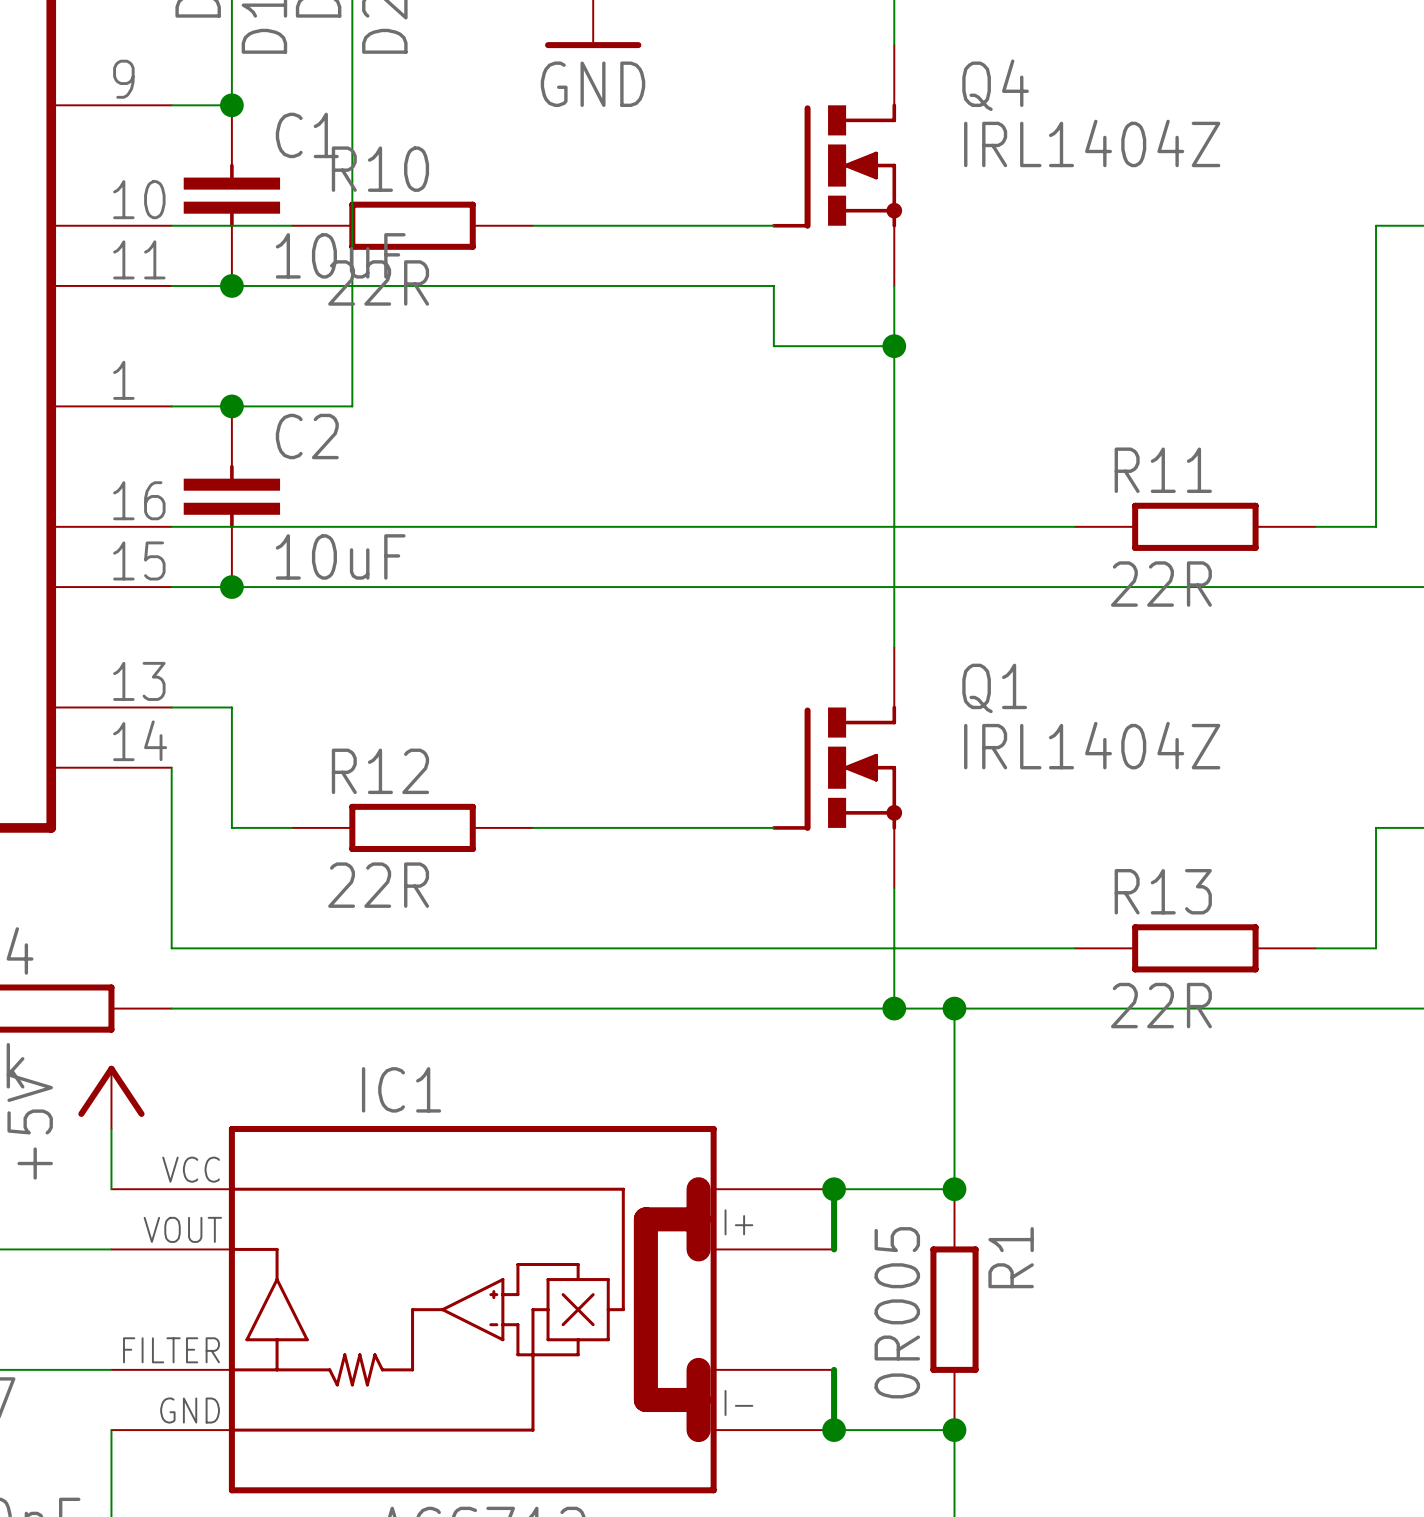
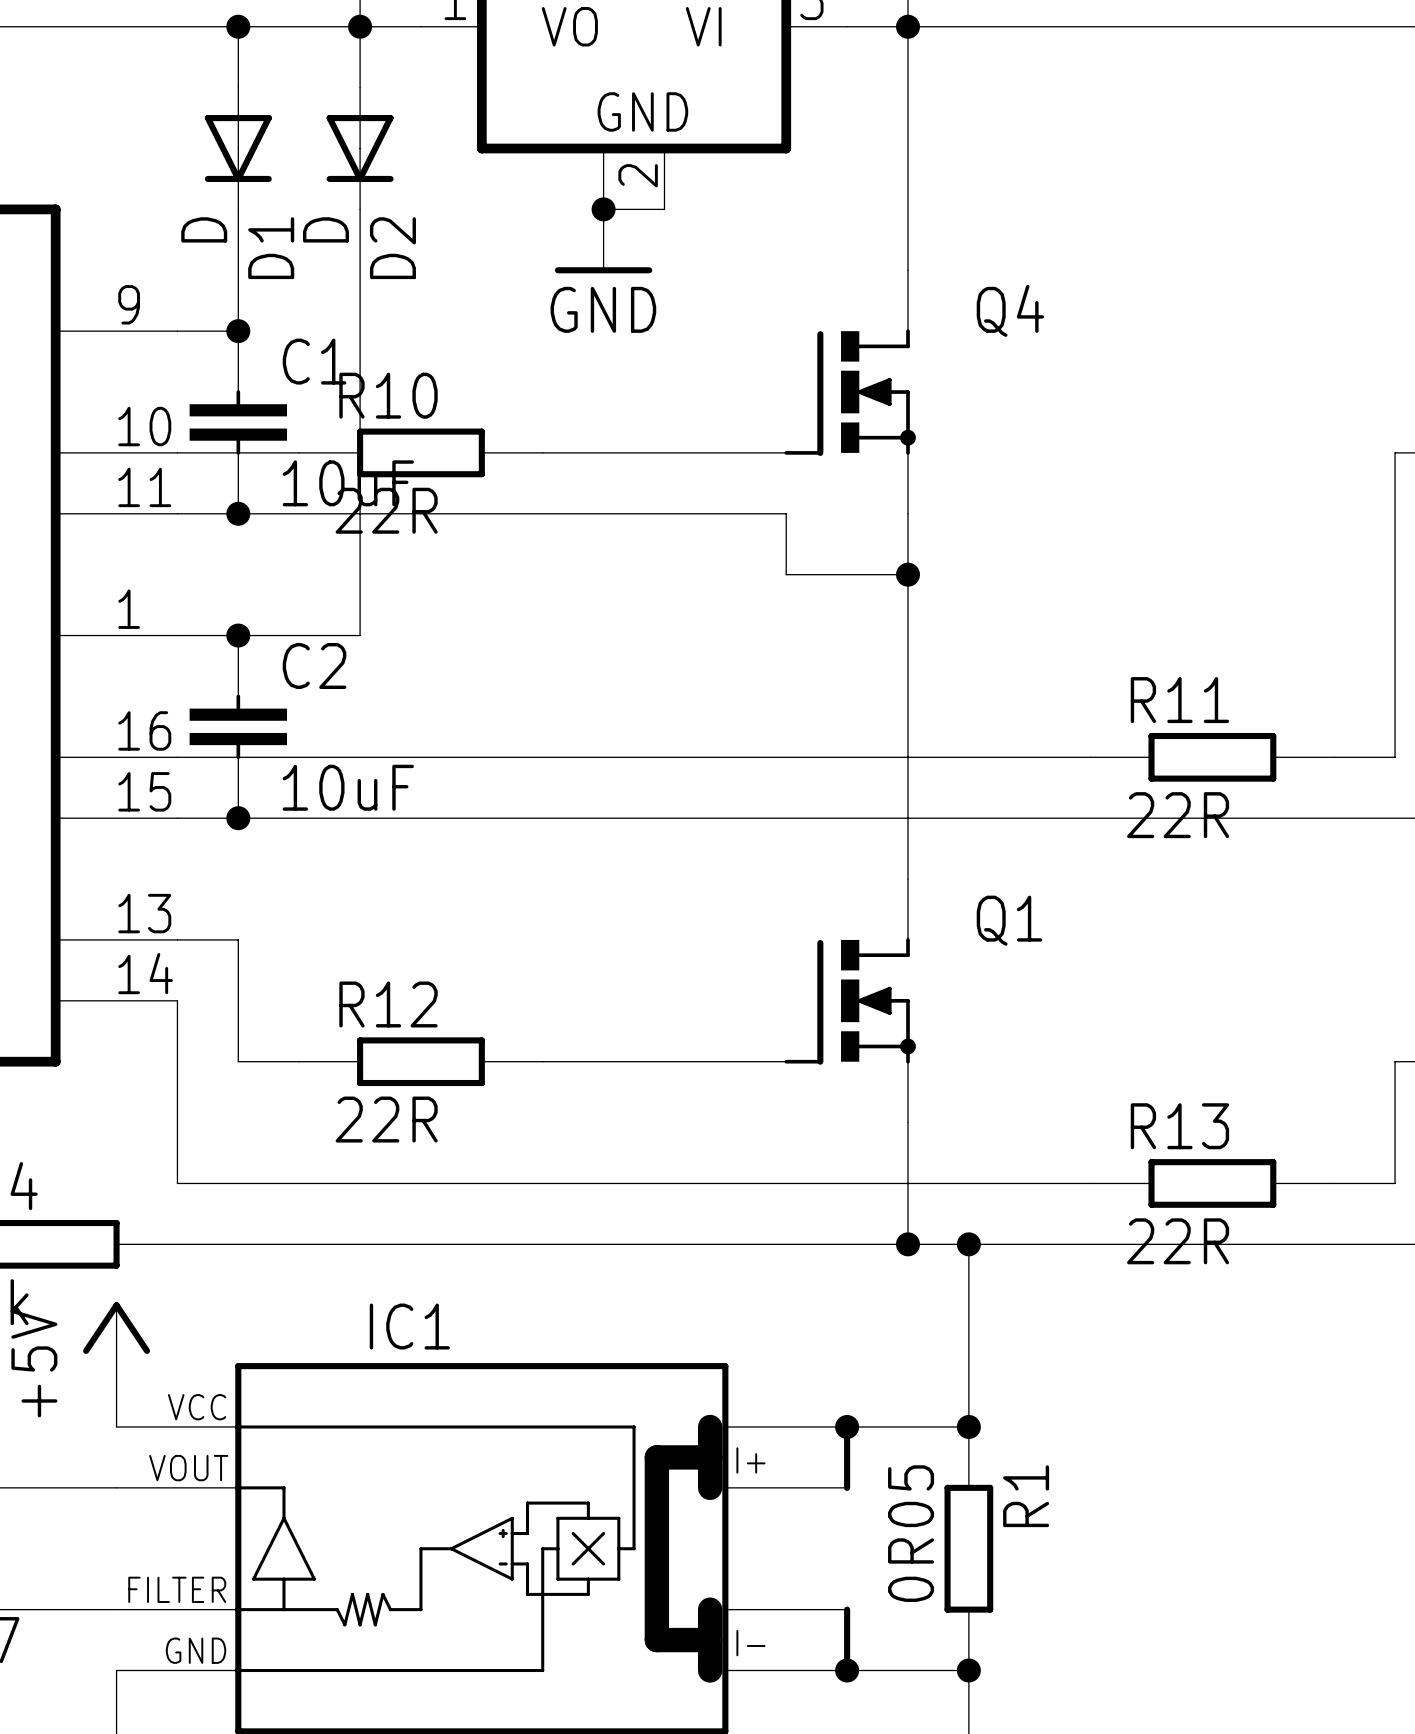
Q4 value: IRL1404Z (1092, 143) -> none
Q1 value: IRL1404Z (1092, 745) -> none
R1 value: 0R005 (897, 1312) -> 0R05 (911, 1533)

